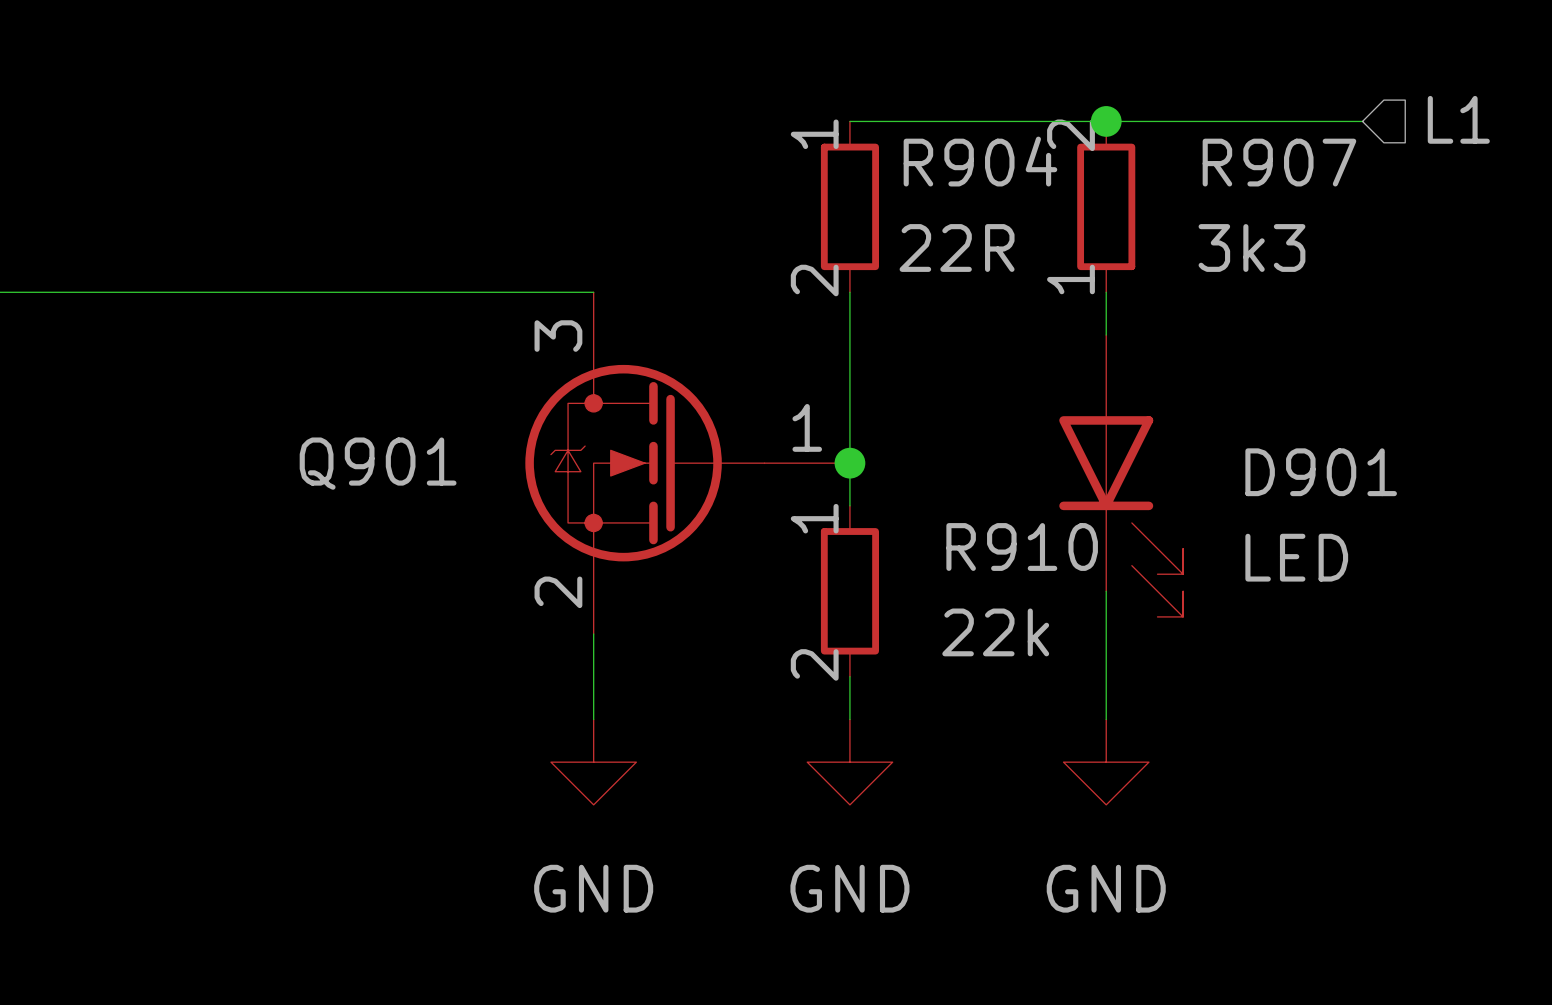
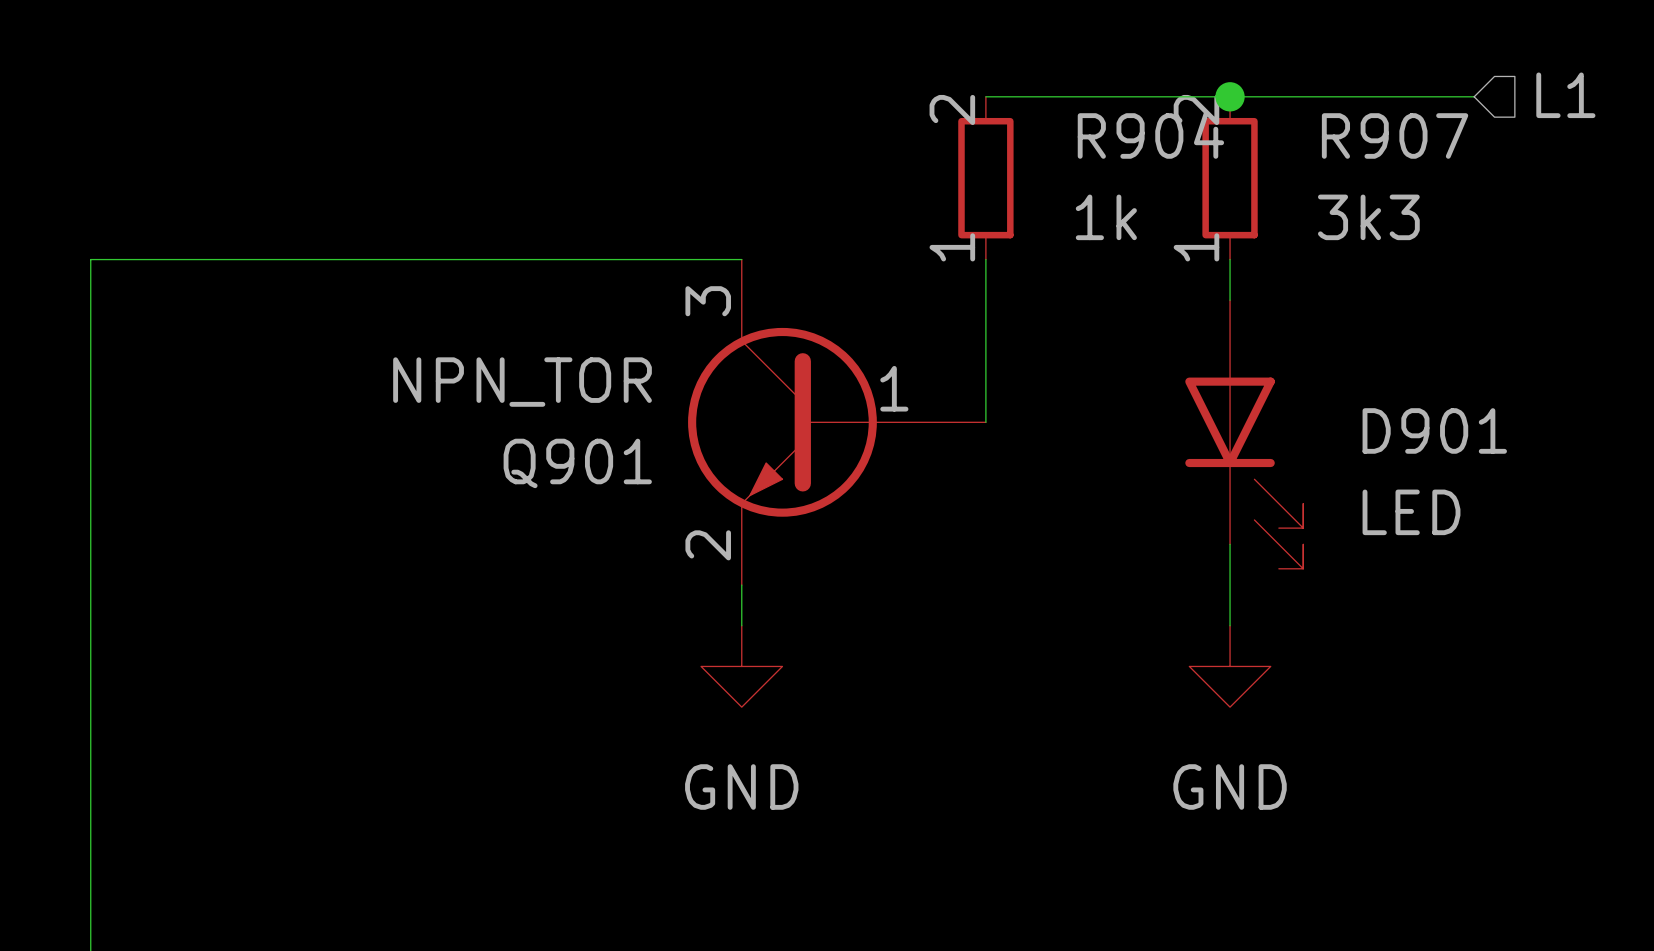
R904 rotation: 0° (849, 206) -> 180° (985, 178)
R904 value: 22R (957, 247) -> 1k (1106, 217)
Q901 symbol: [525, 292, 850, 635] -> [688, 259, 986, 586]
Q901 value: none -> NPN_TOR (522, 382)
wire: (849, 463) (849, 505) -> none
junction: (849, 463) -> none
R910: 22k (849, 591) -> none
wire: (849, 676) (849, 719) -> none
power symbol position: GND (593, 762) -> GND (741, 666)
power symbol: GND (849, 762) -> none
power symbol position: GND (1106, 762) -> GND (1230, 666)

